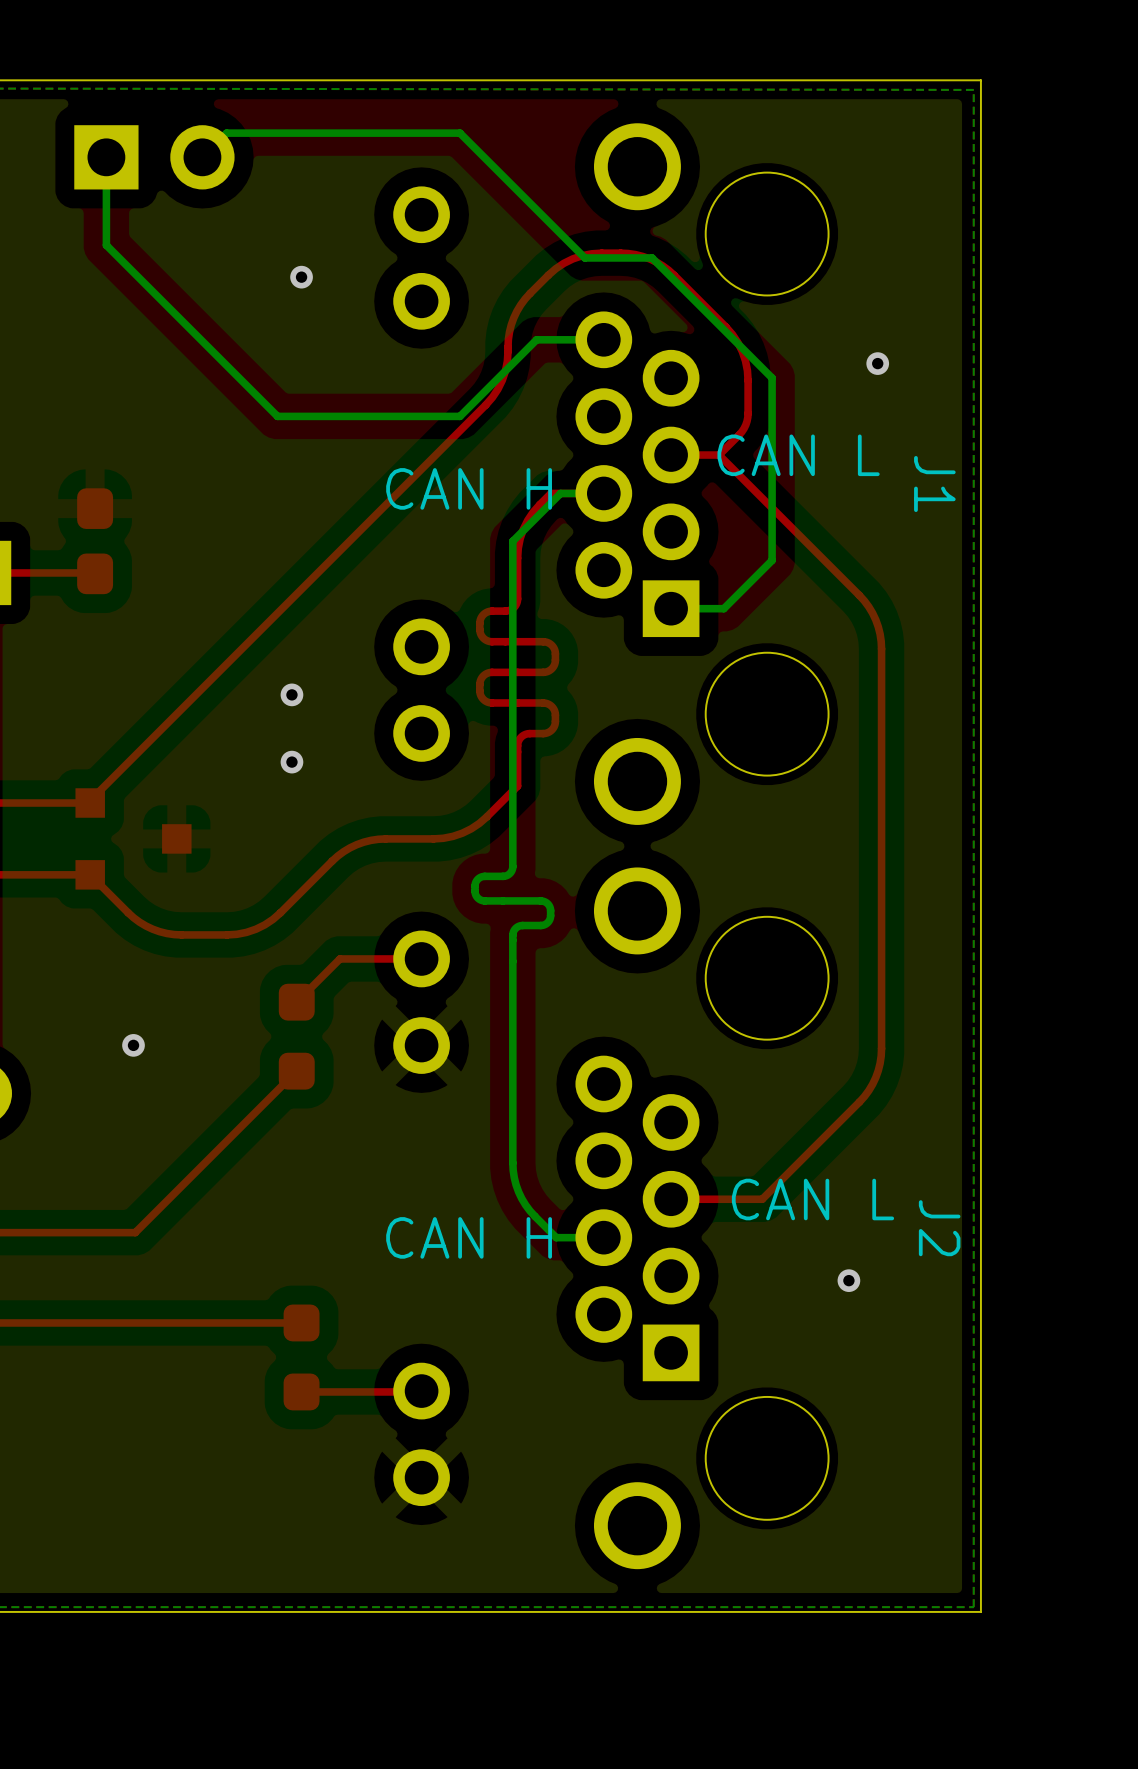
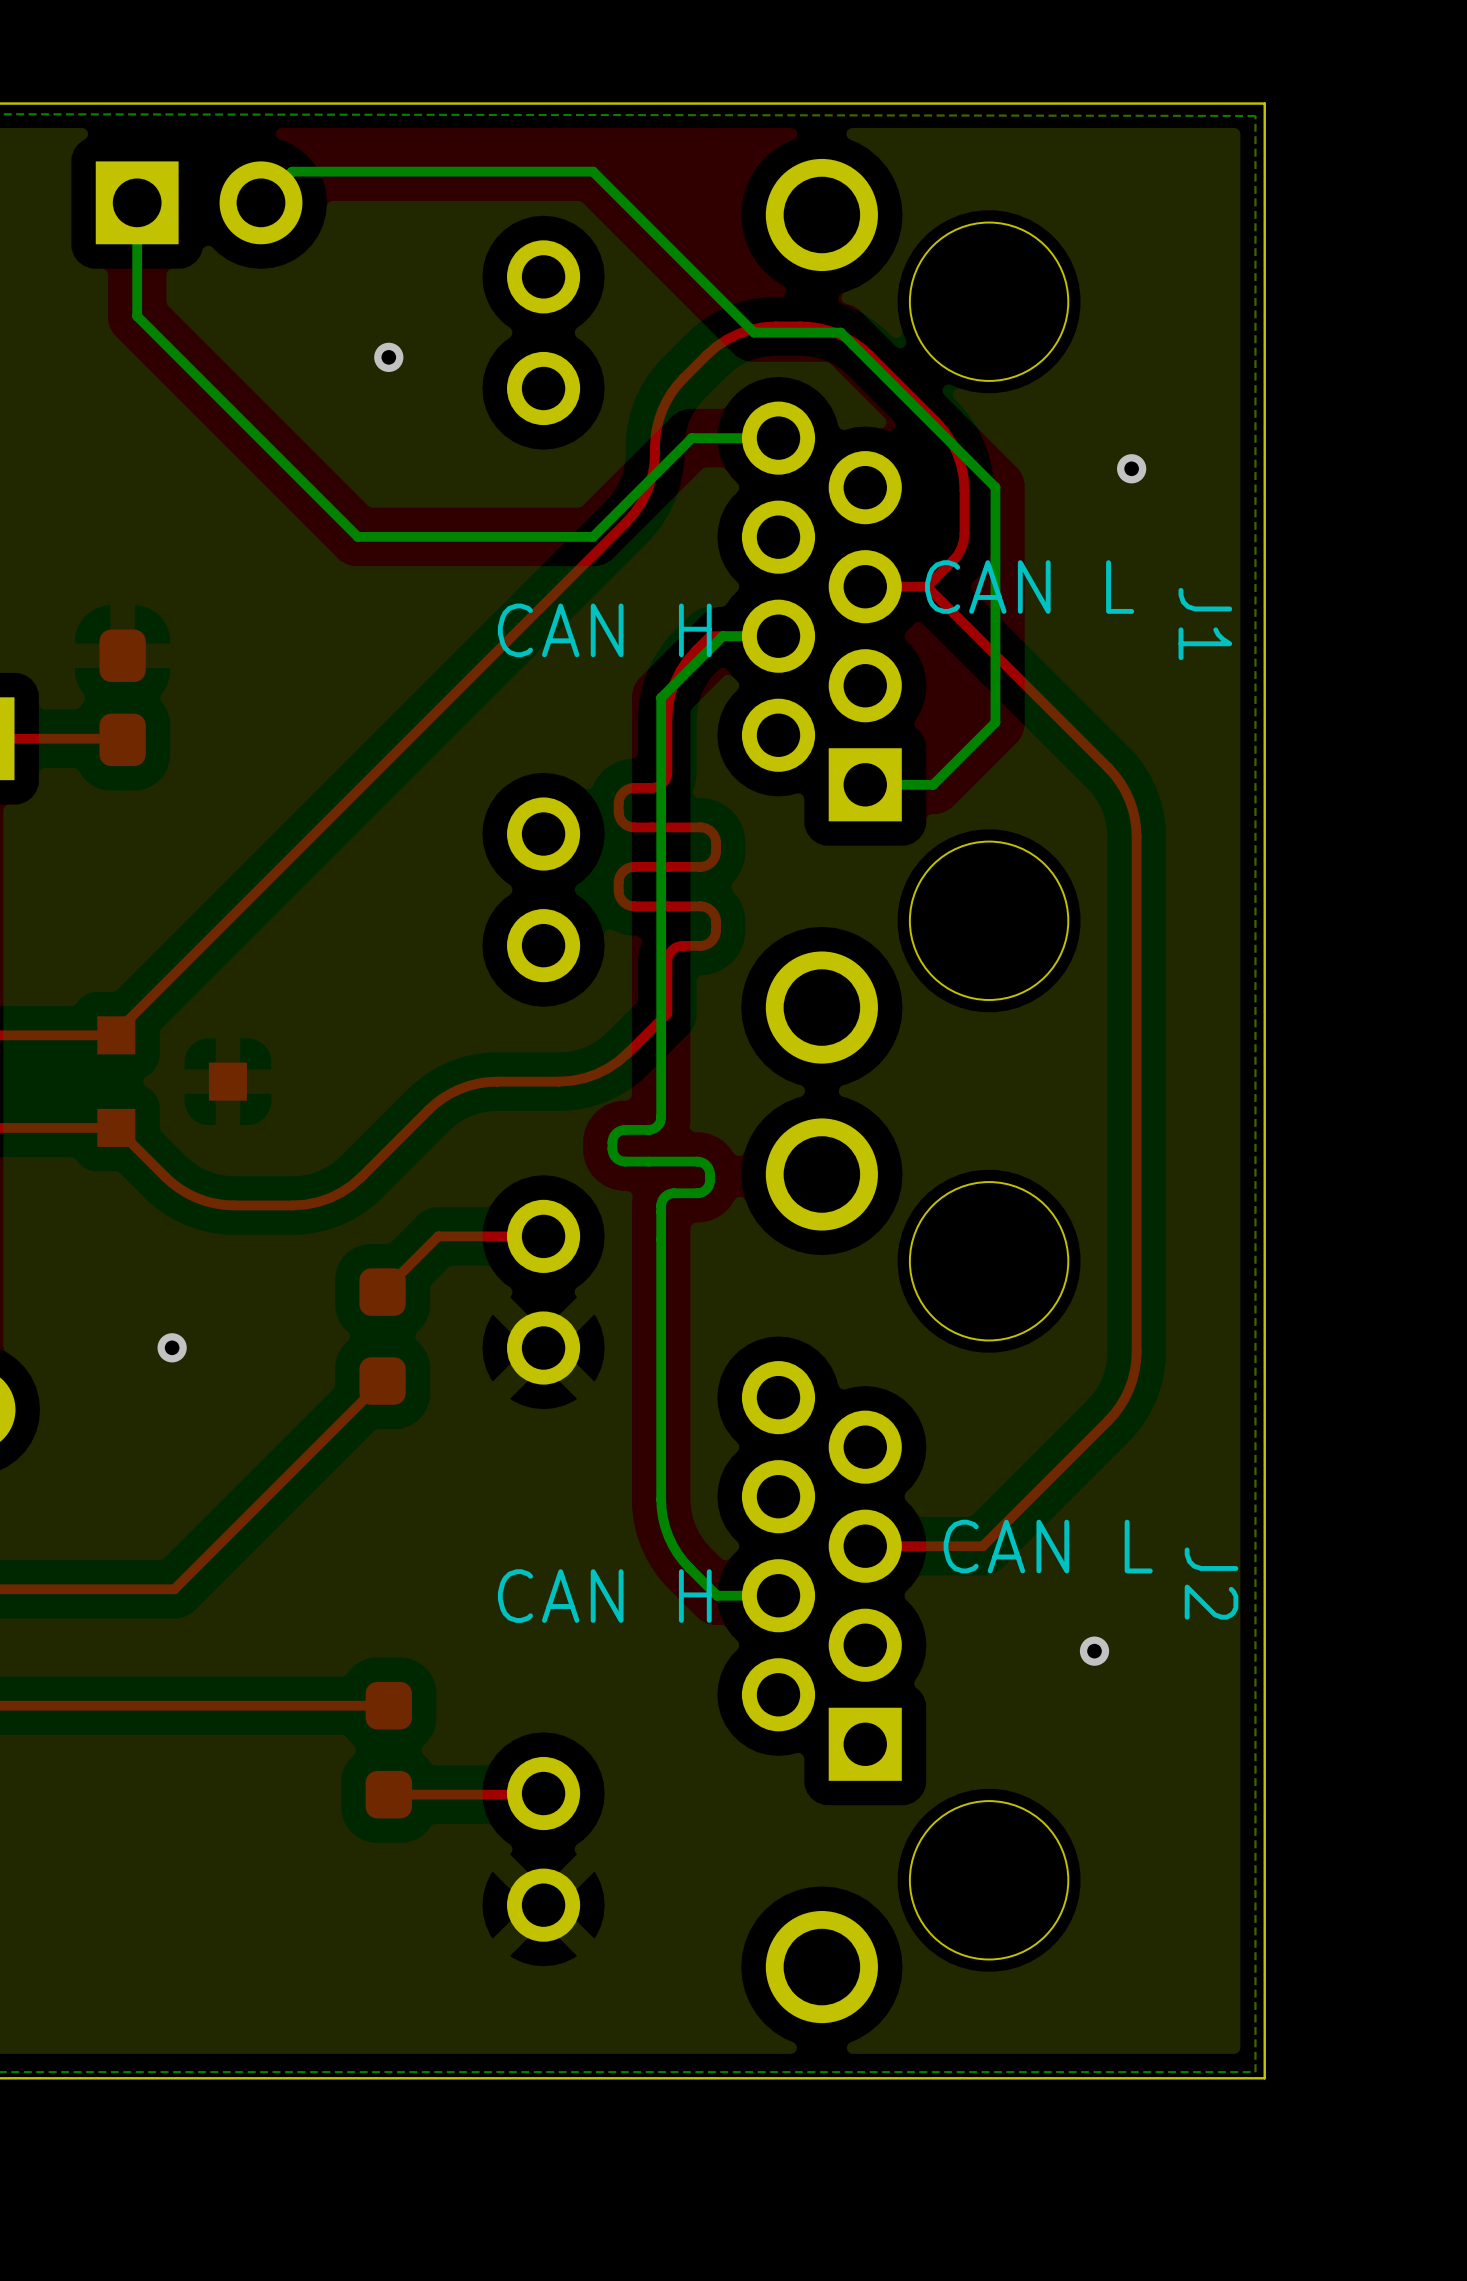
via: (291, 694) -> none
via: (291, 762) -> none

